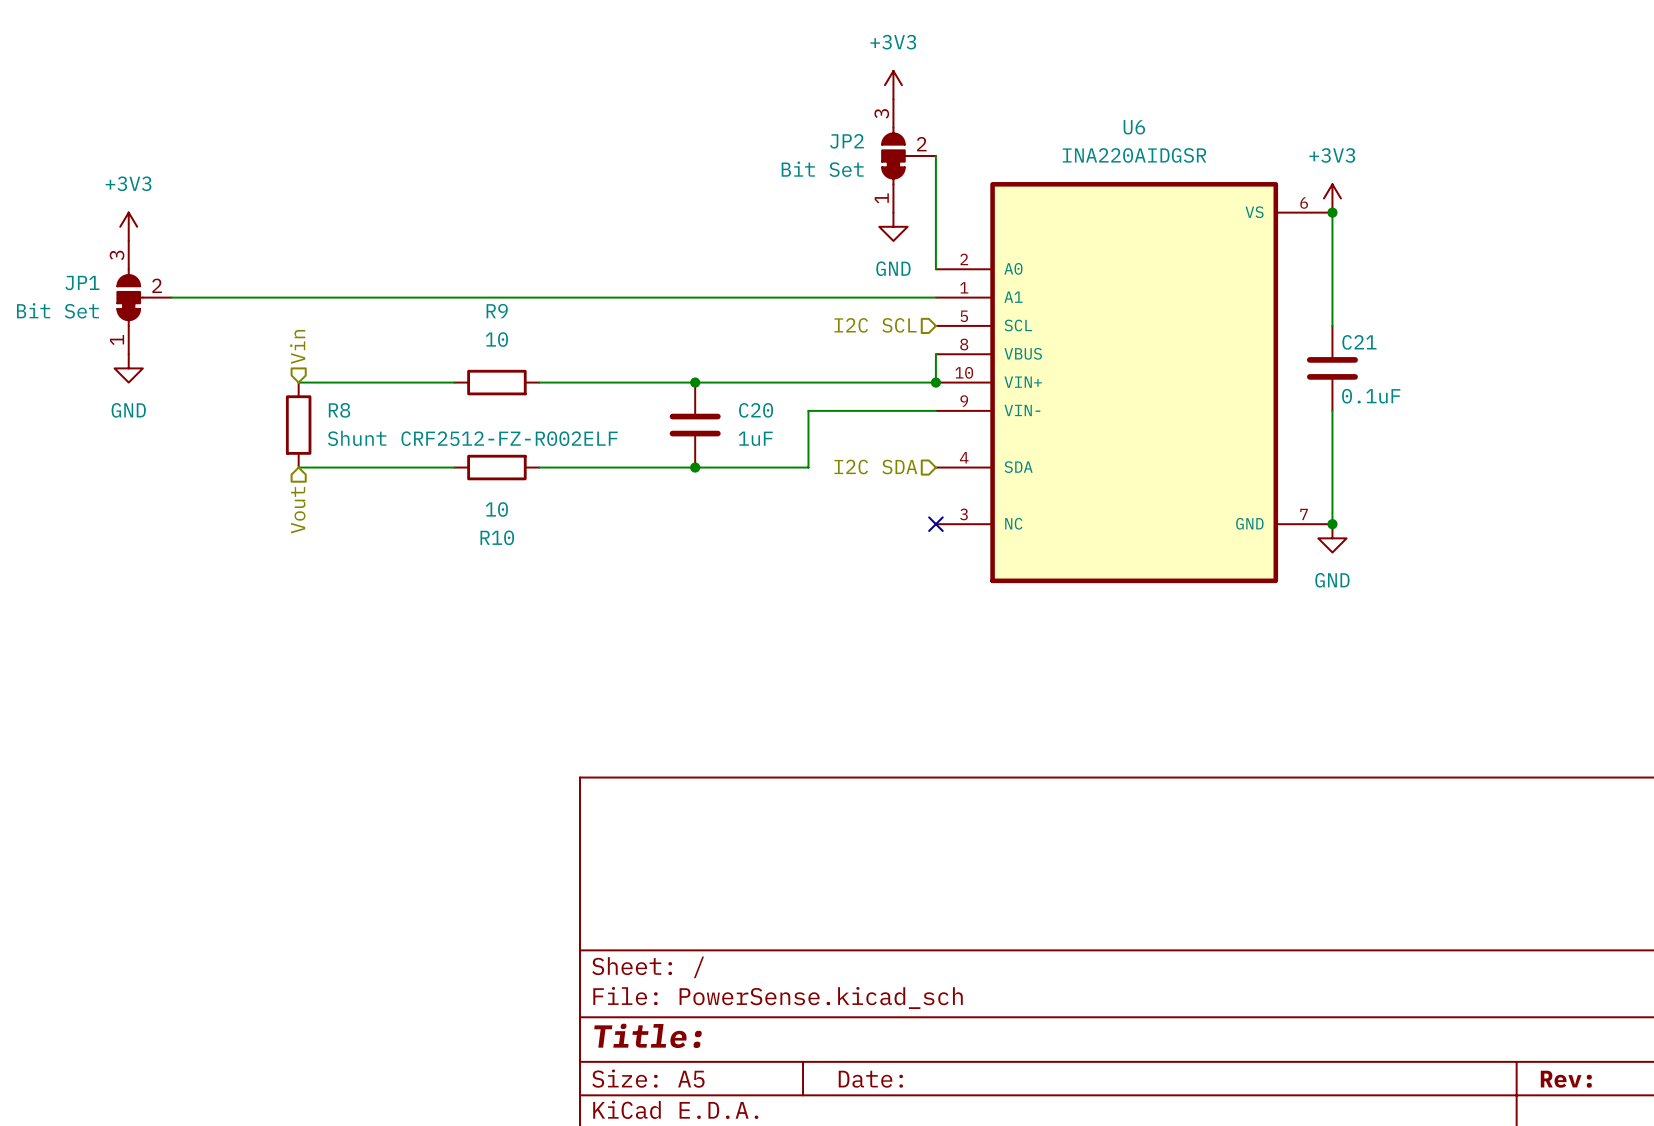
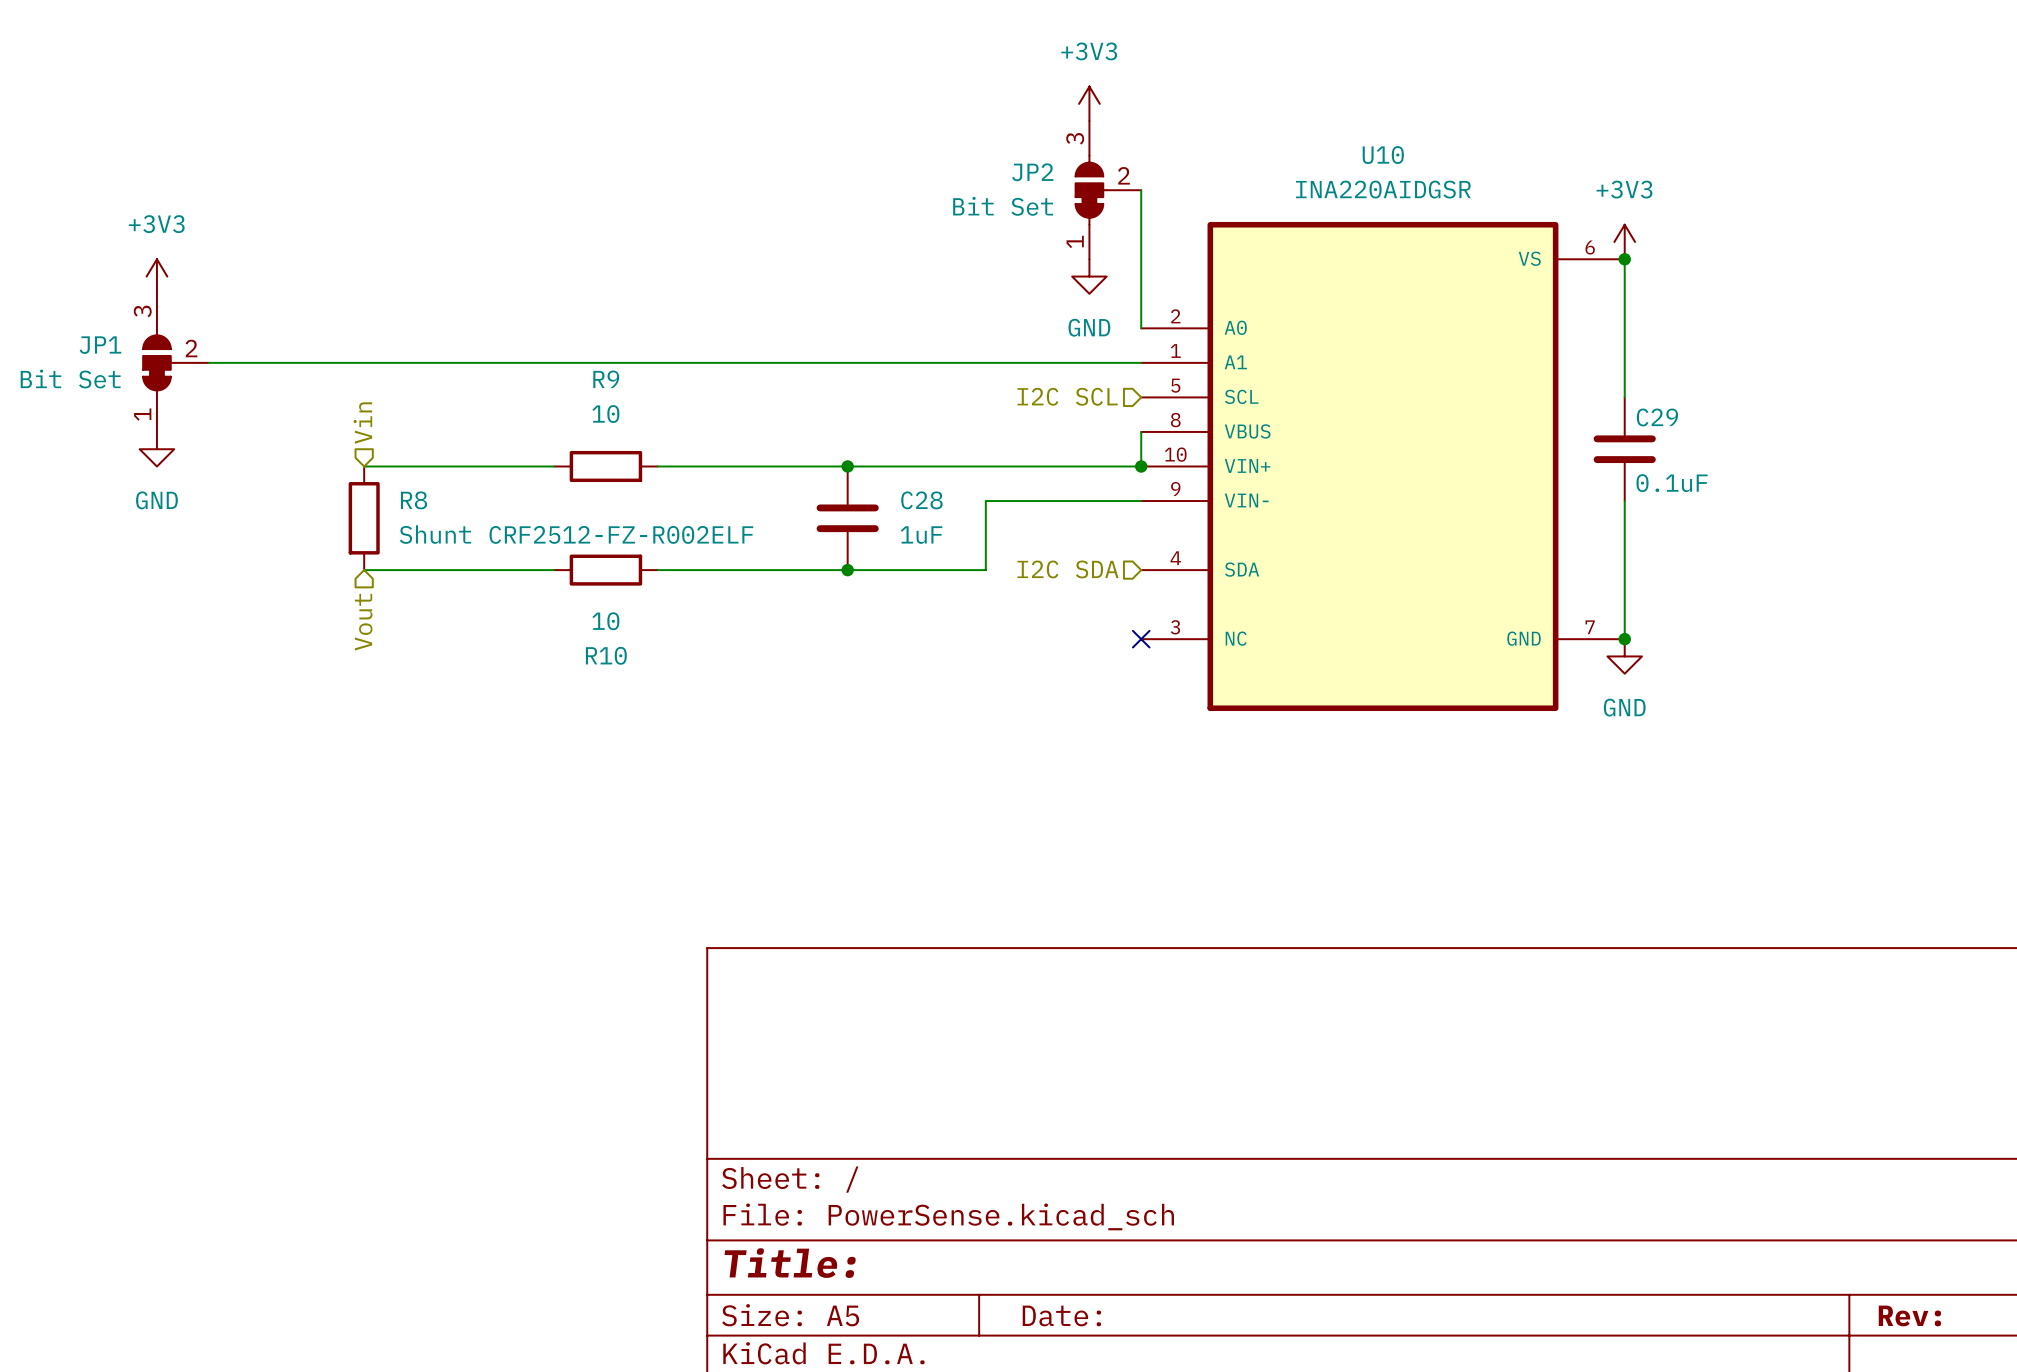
U6 name: U6 (1134, 127) -> U10 (1383, 155)
C21 name: C21 (1359, 342) -> C29 (1657, 417)
C20 name: C20 (756, 410) -> C28 (921, 500)

